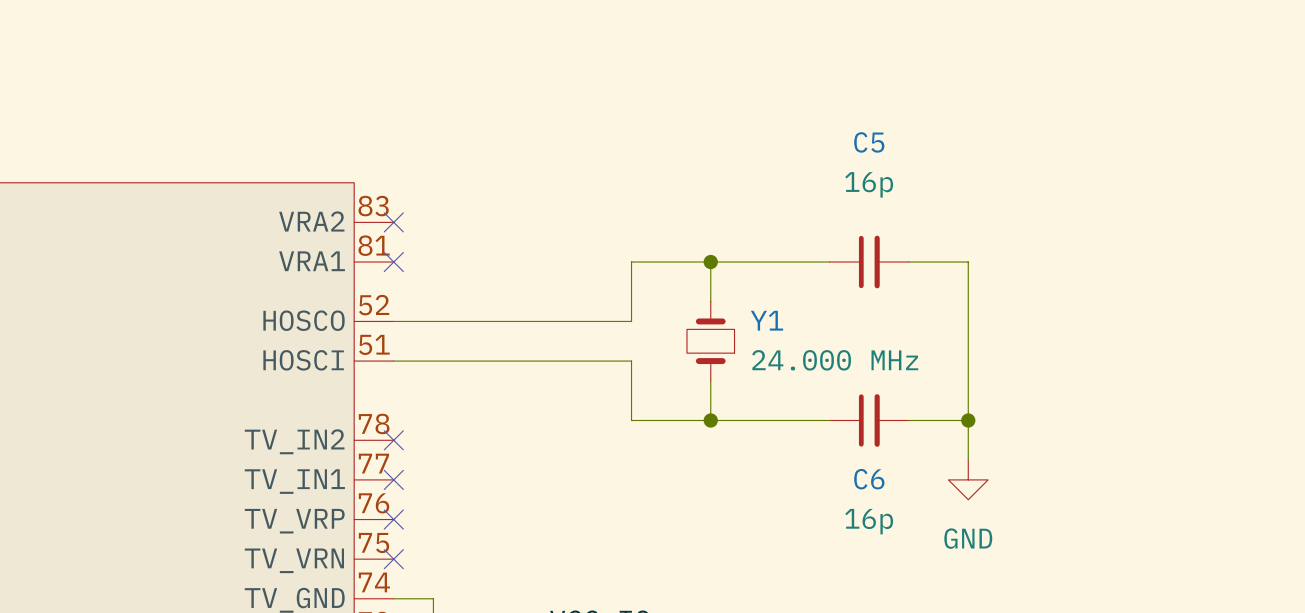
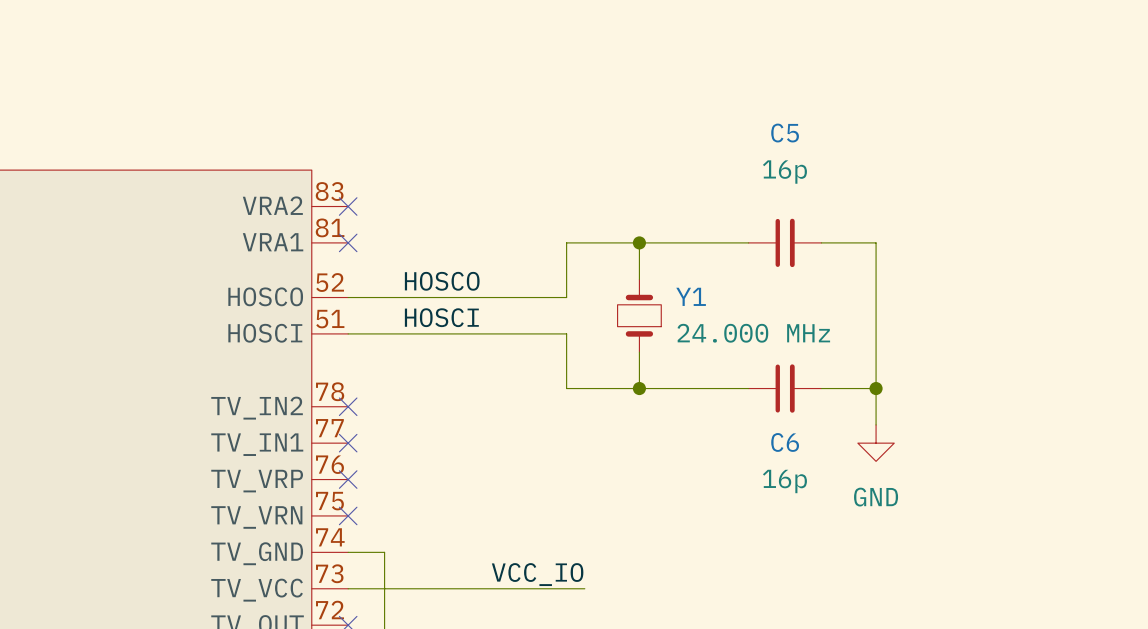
label: none -> HOSCO (442, 281)
label: none -> HOSCI (441, 317)

